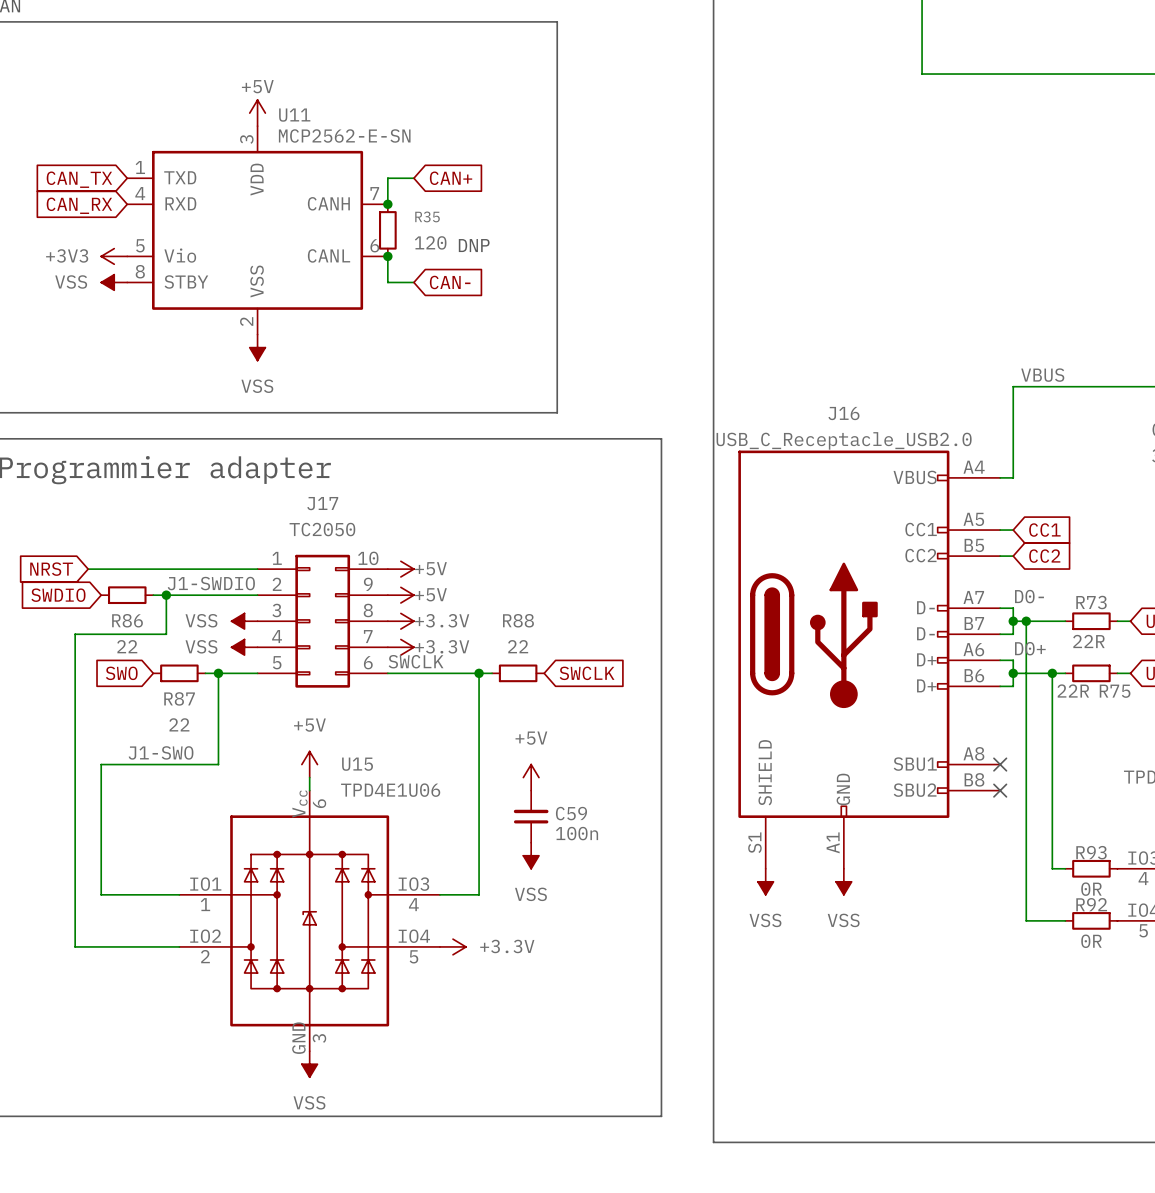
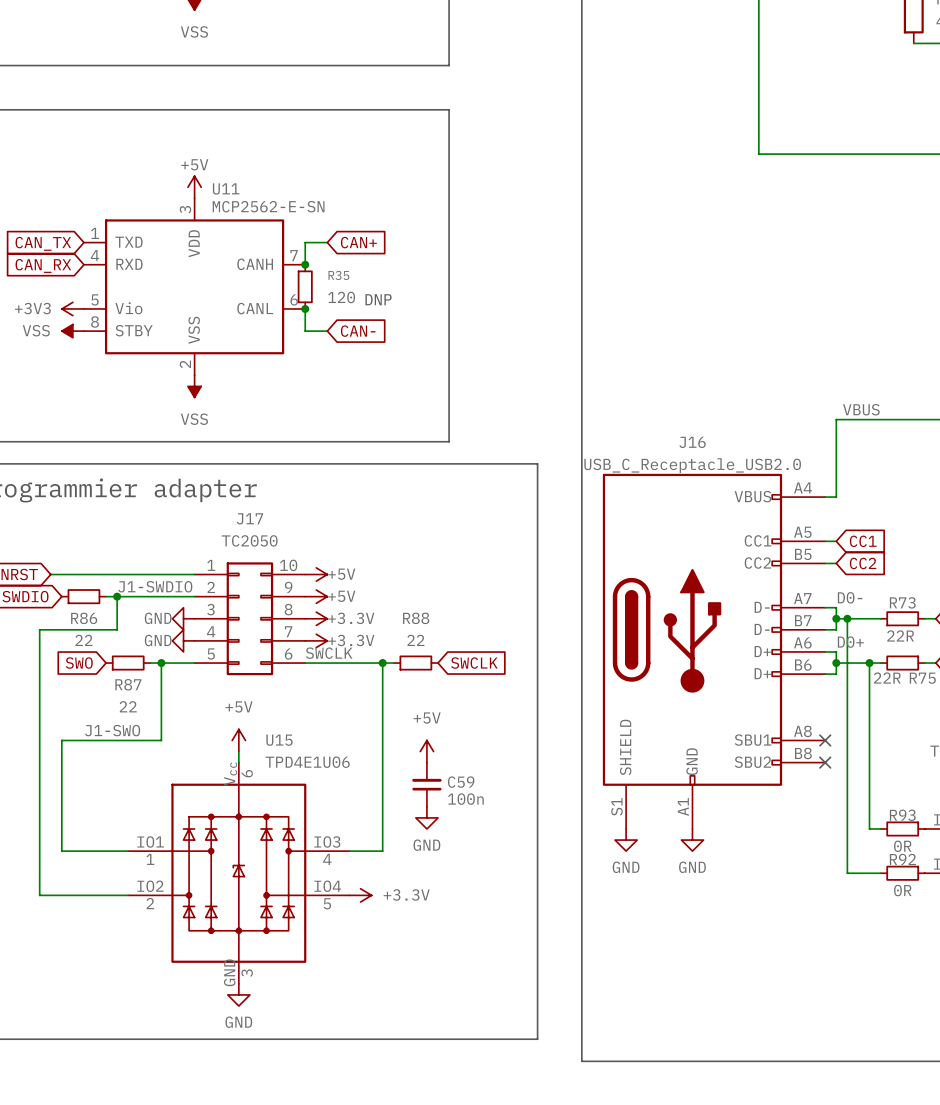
power symbol: VSS (244, 621) -> GND (183, 618)
power symbol: VSS (244, 647) -> GND (183, 640)
power symbol: VSS (531, 855) -> GND (426, 817)
power symbol: VSS (765, 881) -> GND (626, 840)
power symbol: VSS (843, 881) -> GND (692, 840)
power symbol: VSS (309, 1064) -> GND (238, 994)

